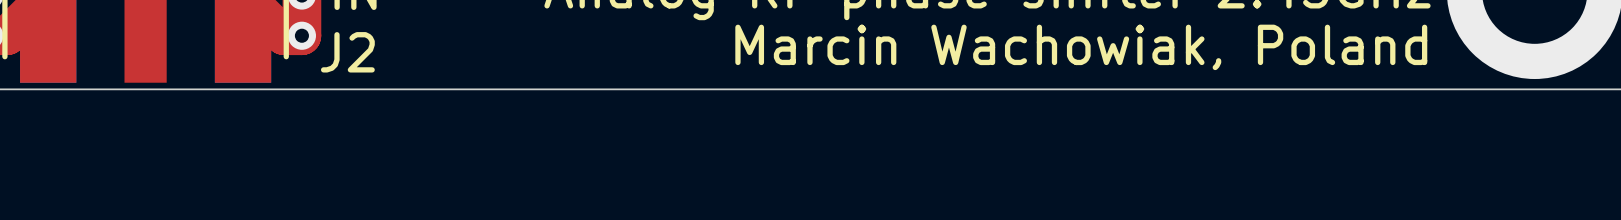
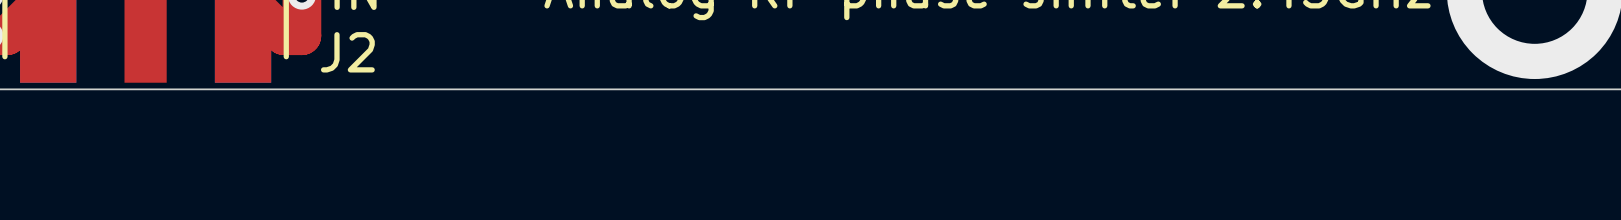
via: (301, 35) -> none
text: Marcin Wachowiak, Poland (1081, 47) -> none

